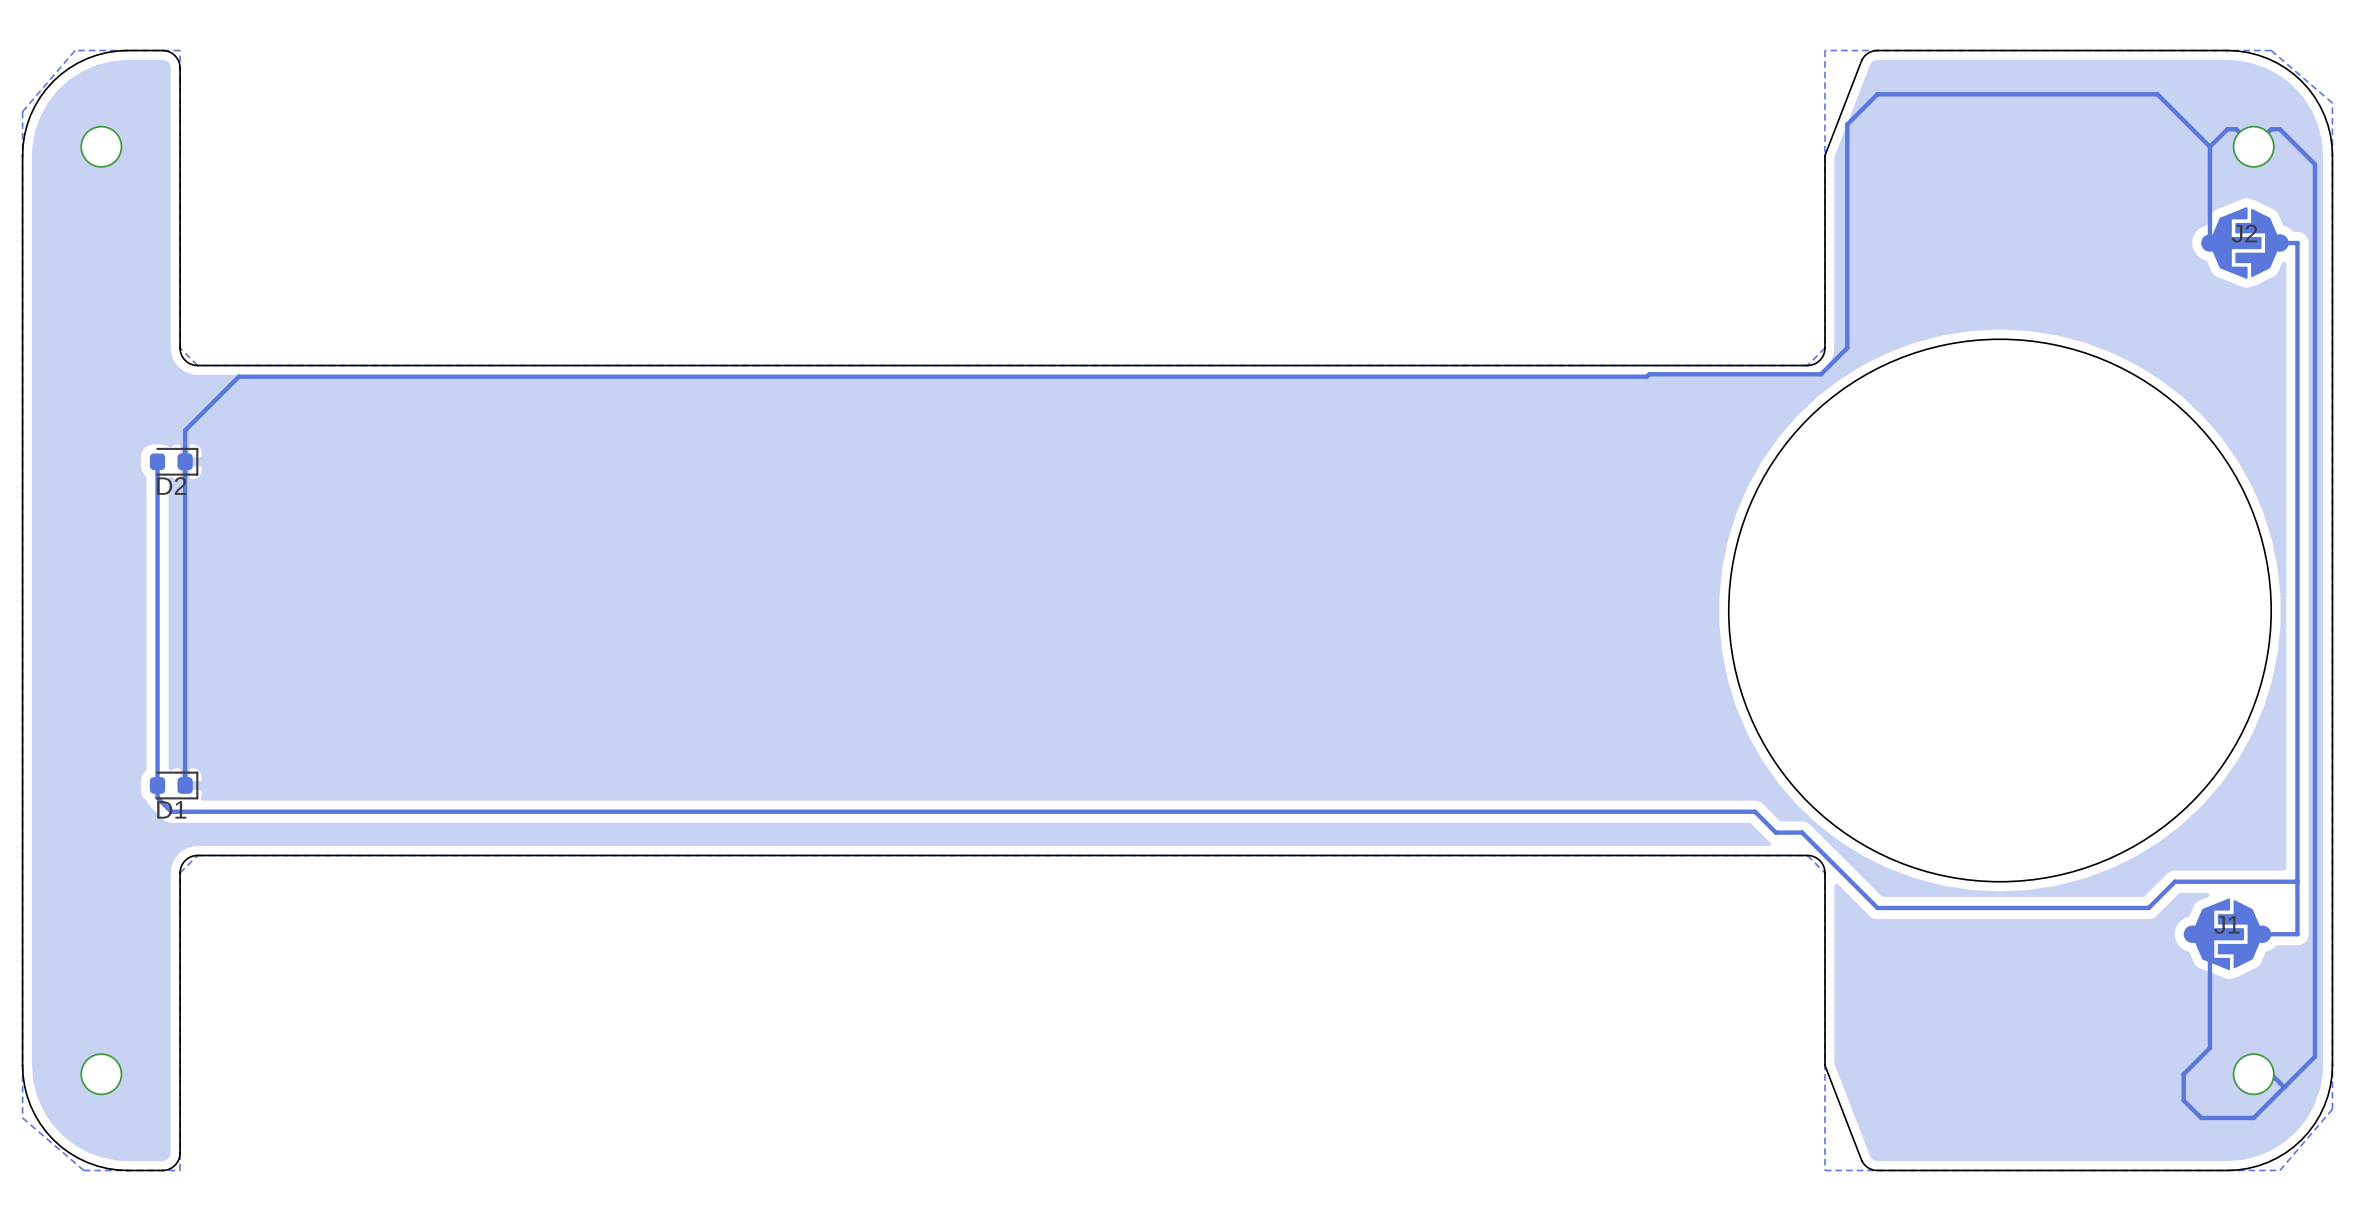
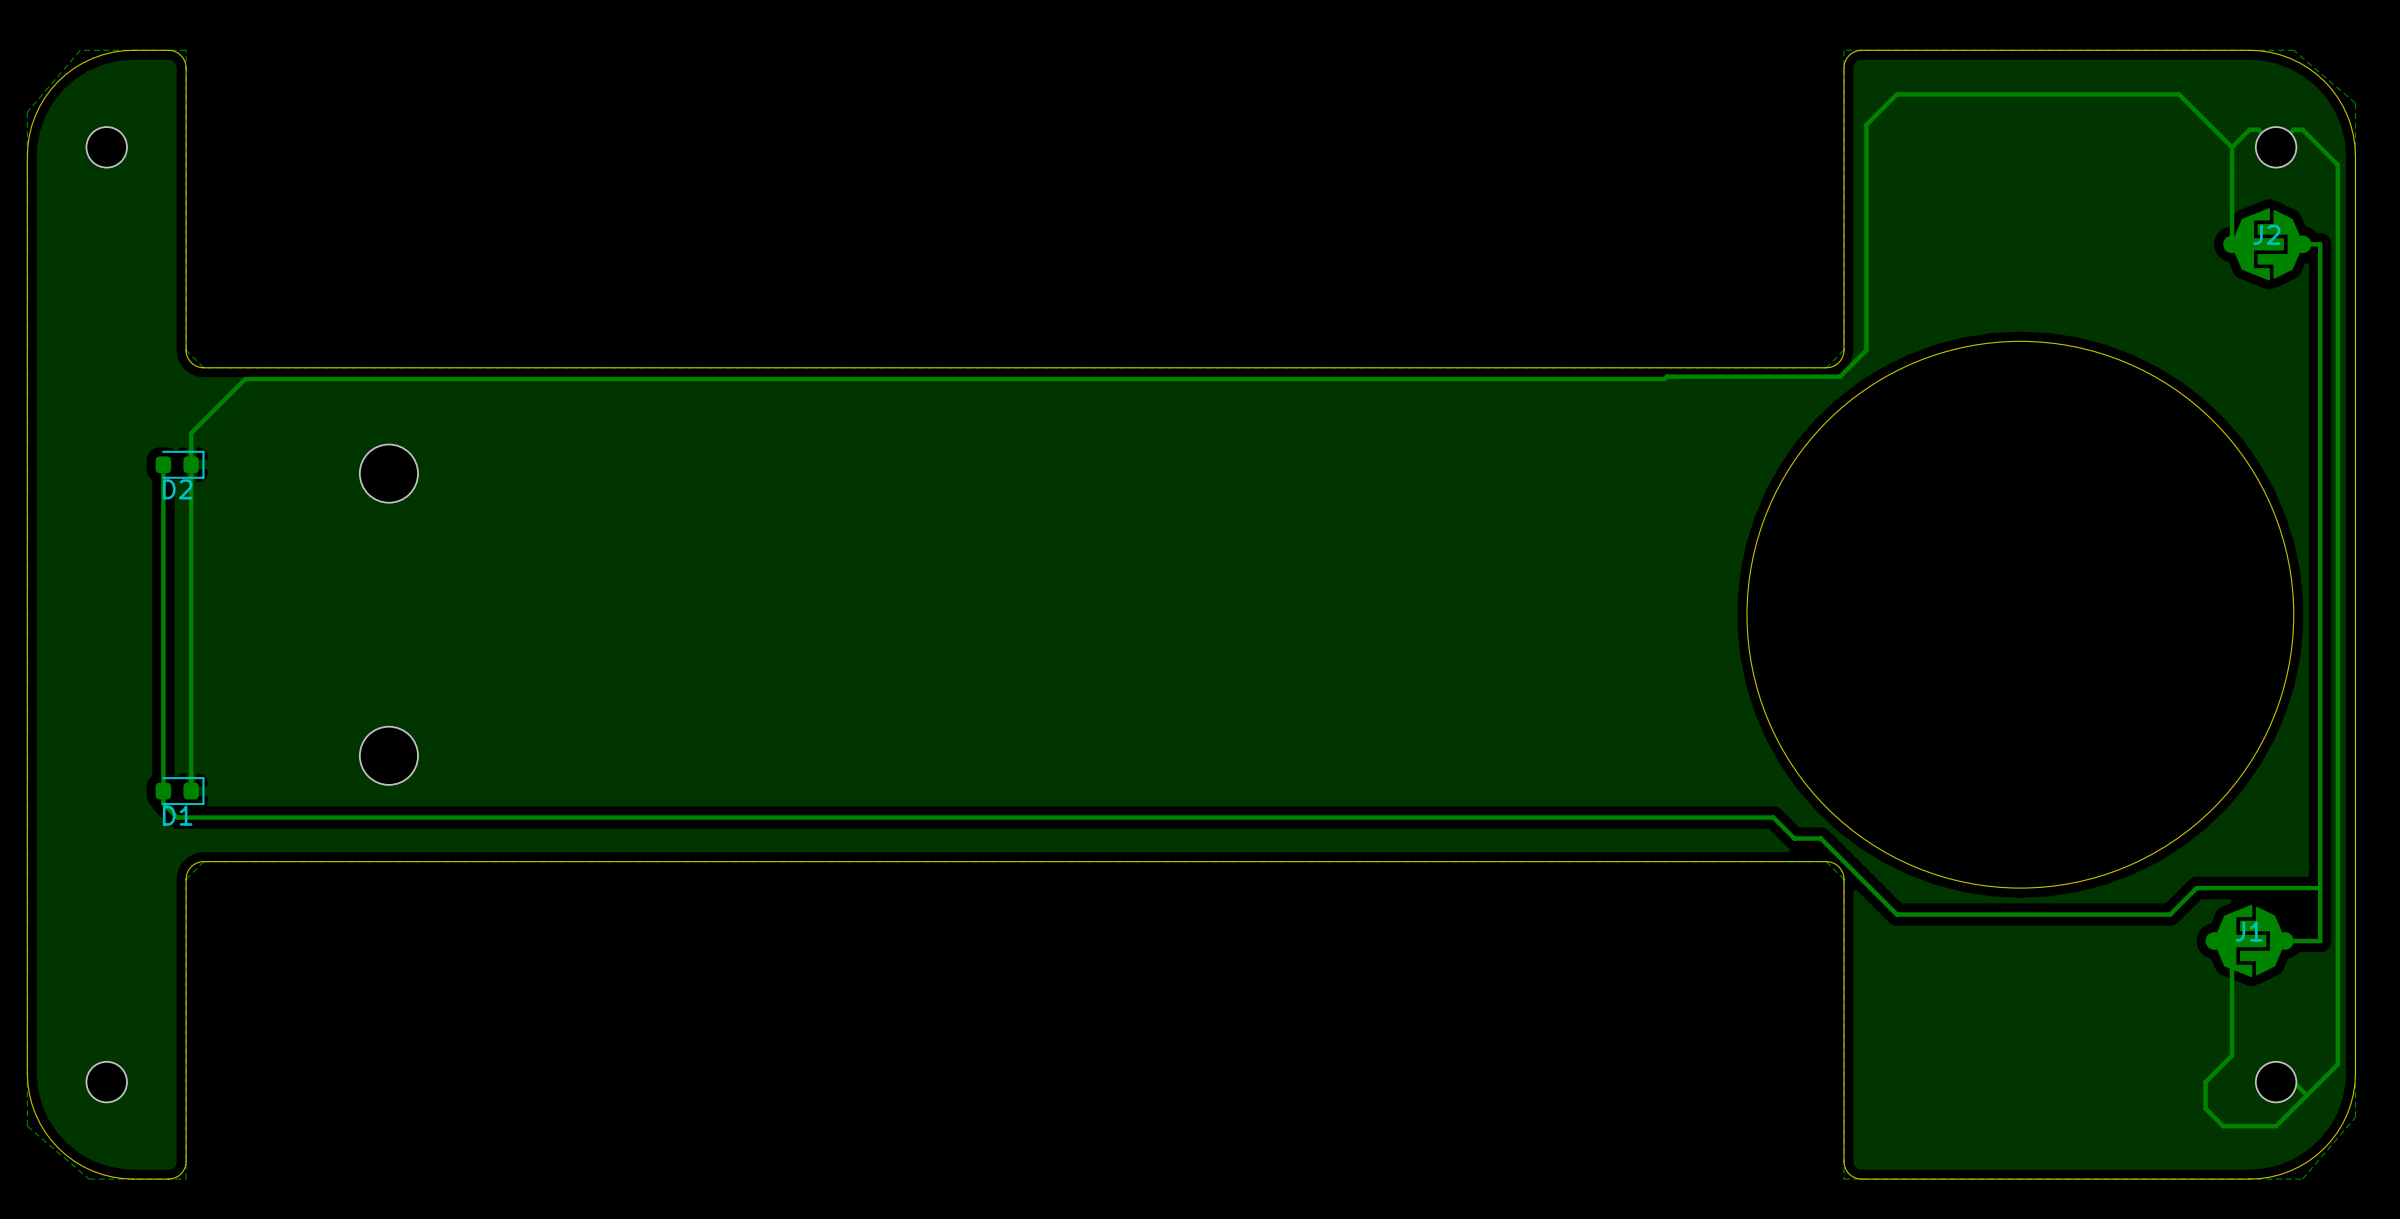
board edge: (1877, 50) (1868, 53) (1861, 60) (1824, 155) -> (1896, 50) (1859, 50) (1850, 53) (1846, 59) (1843, 67) (1843, 156)
via: none -> (388, 473)
via: none -> (388, 755)
board edge: (1824, 1065) (1861, 1160) (1868, 1167) (1877, 1170) -> (1843, 1073) (1843, 1161) (1846, 1170) (1850, 1175) (1859, 1178) (1896, 1179)

